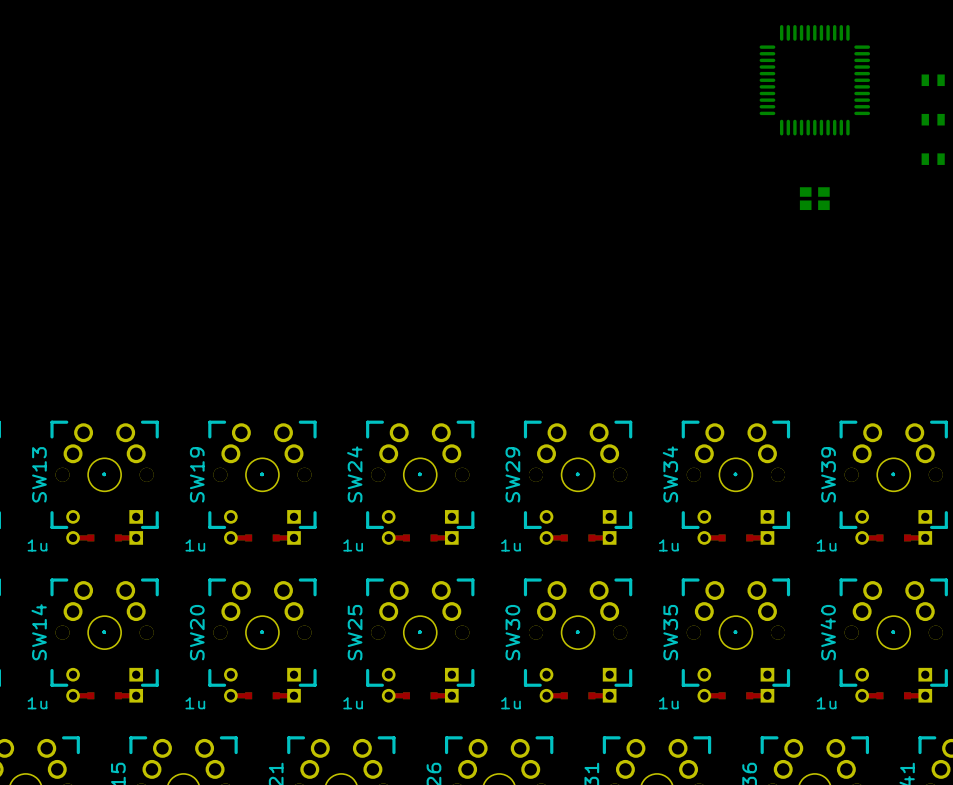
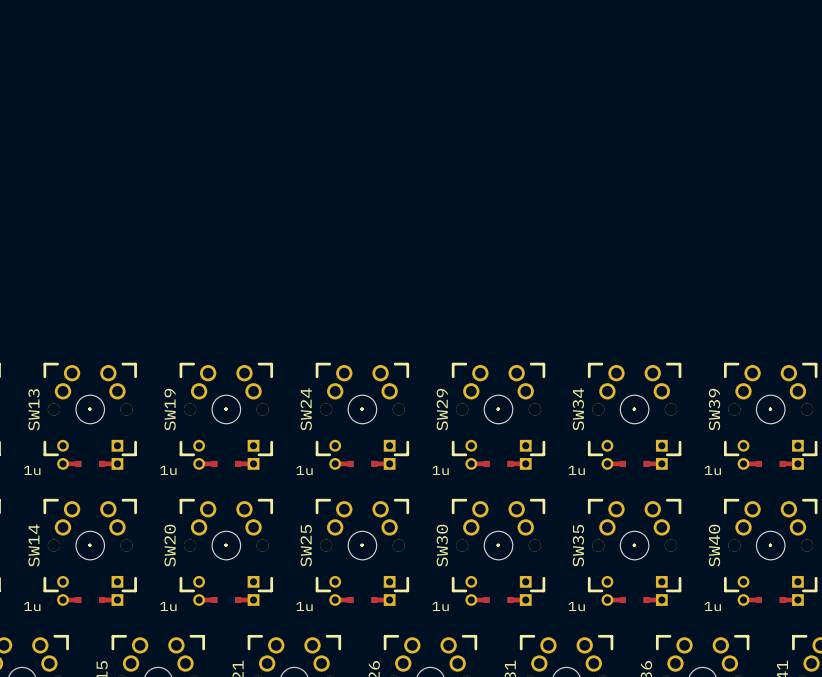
part: (814, 80) -> none
part: (933, 80) -> none
part: (933, 119) -> none
part: (933, 159) -> none
part: (814, 198) -> none

